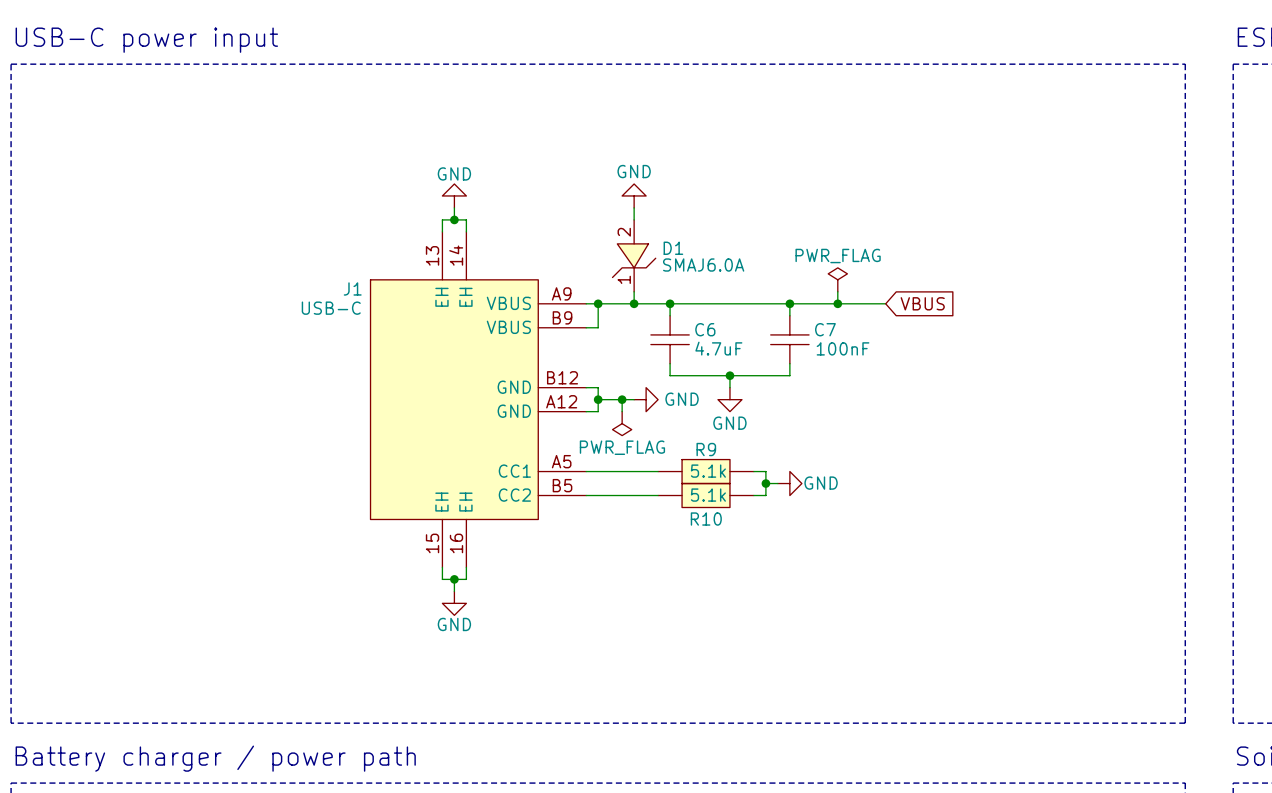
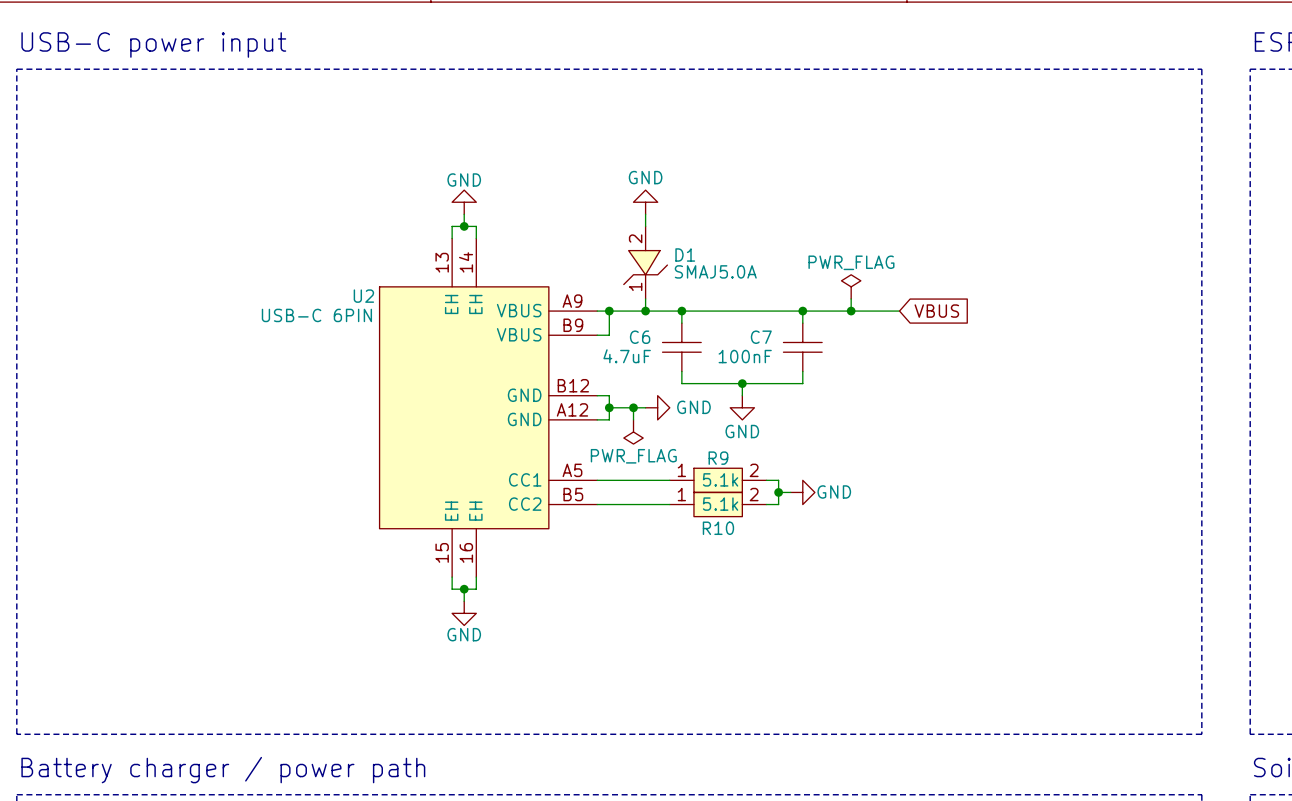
D1 value: SMAJ6.0A (703, 265) -> SMAJ5.0A (715, 271)
J1 name: J1 (352, 288) -> U2 (363, 296)
J1 value: USB-C (331, 308) -> USB-C 6PIN (316, 315)
C6 name position: C6 (705, 329) -> C6 (640, 337)
C7 name position: C7 (825, 329) -> C7 (761, 337)
C6 value position: 4.7uF (718, 348) -> 4.7uF (627, 356)
C7 value position: 100nF (843, 348) -> 100nF (745, 356)
R9 pin number: none -> 1 (681, 470)
R9 pin number: none -> 2 (754, 470)
R10 pin number: none -> 1 (681, 494)
R10 pin number: none -> 2 (754, 494)

